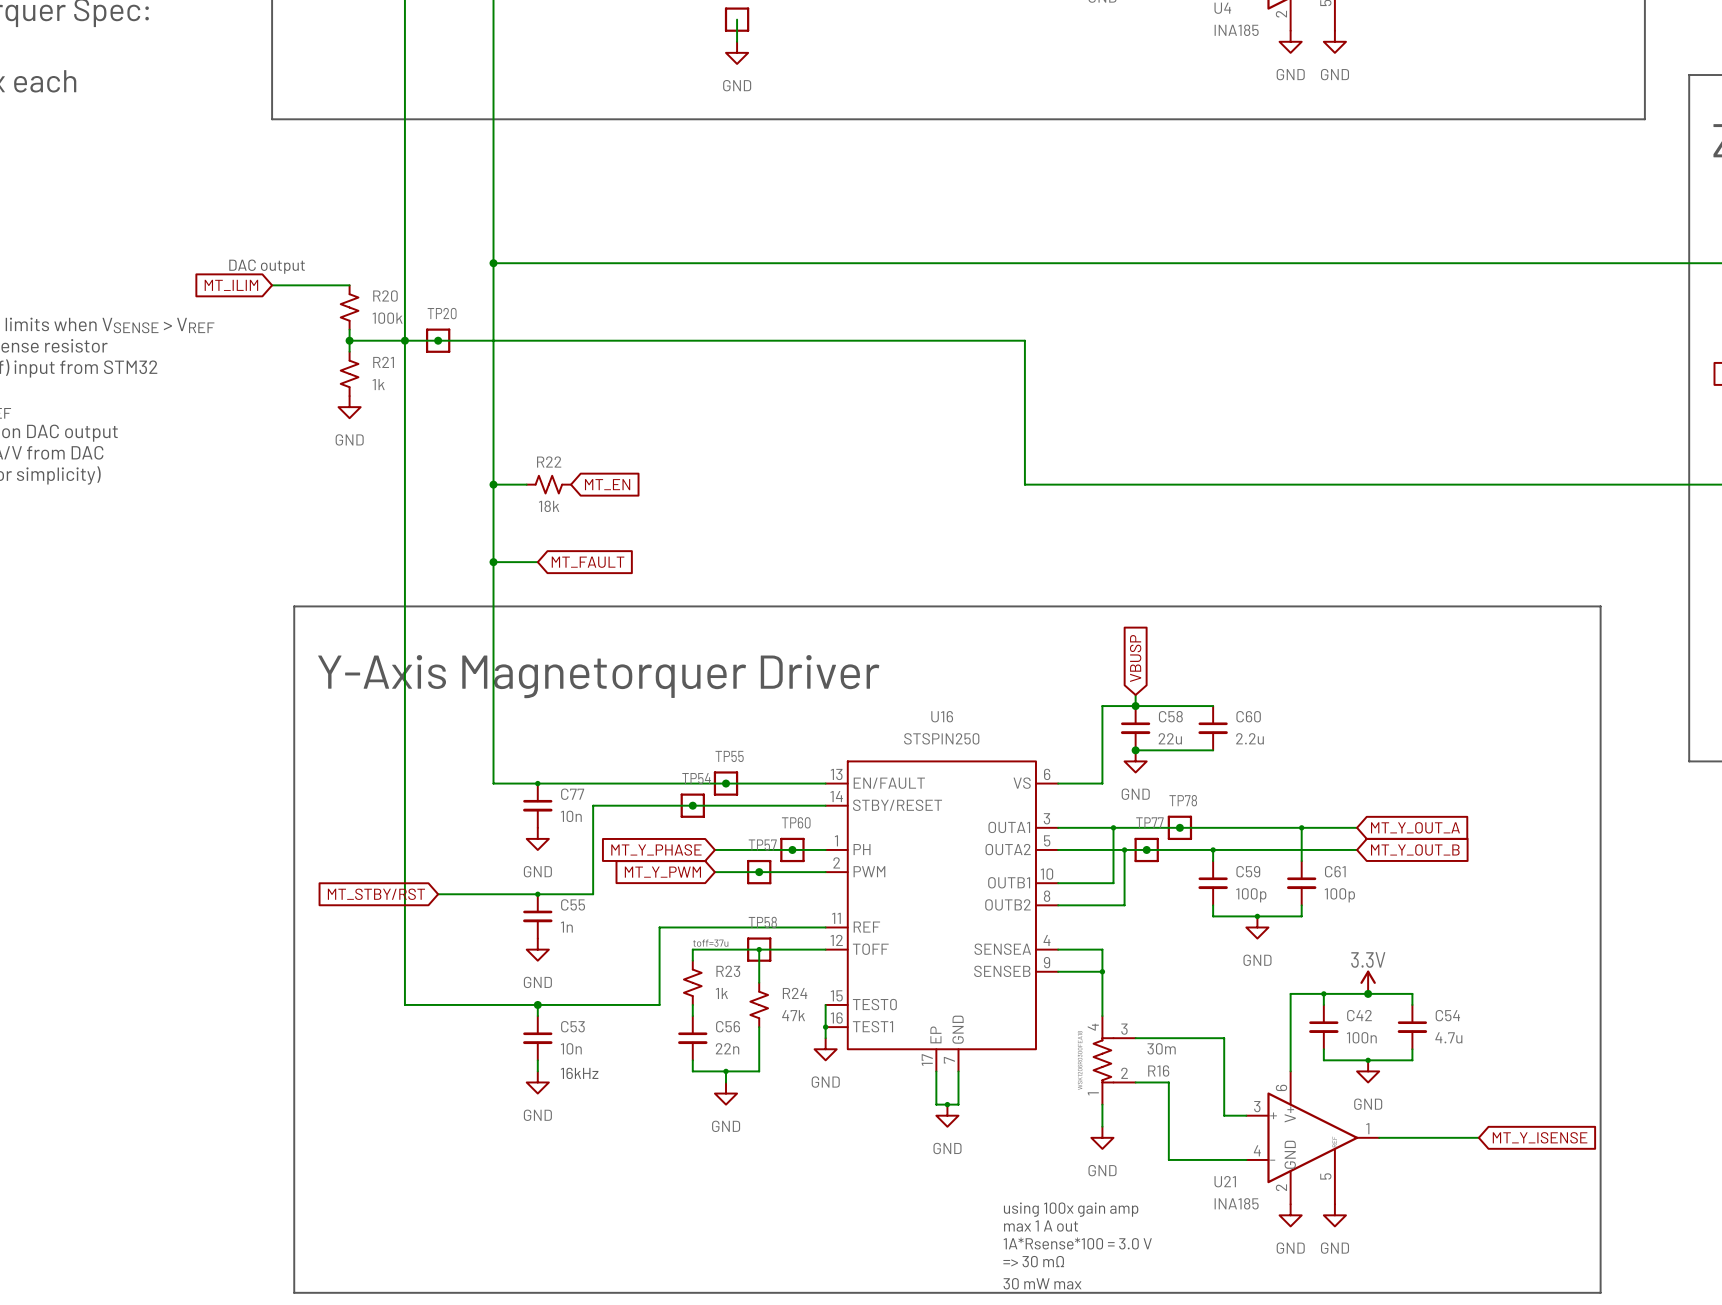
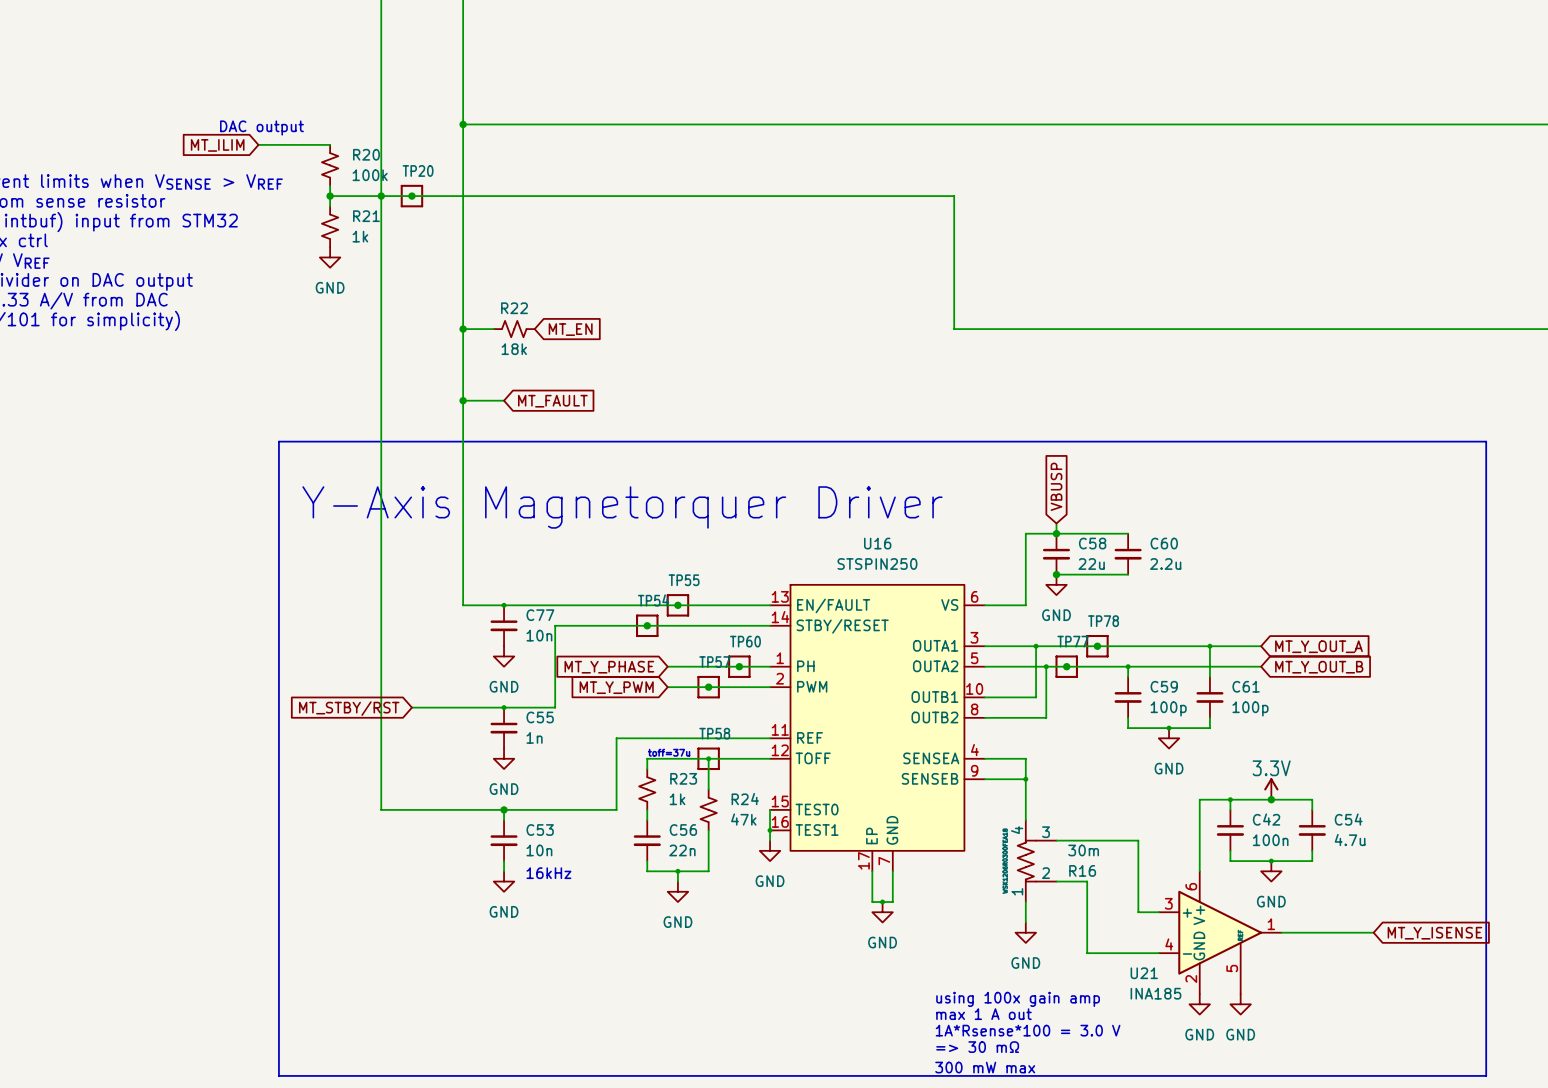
text: 30 mW max (1042, 1283) -> 300 mW max (985, 1067)

